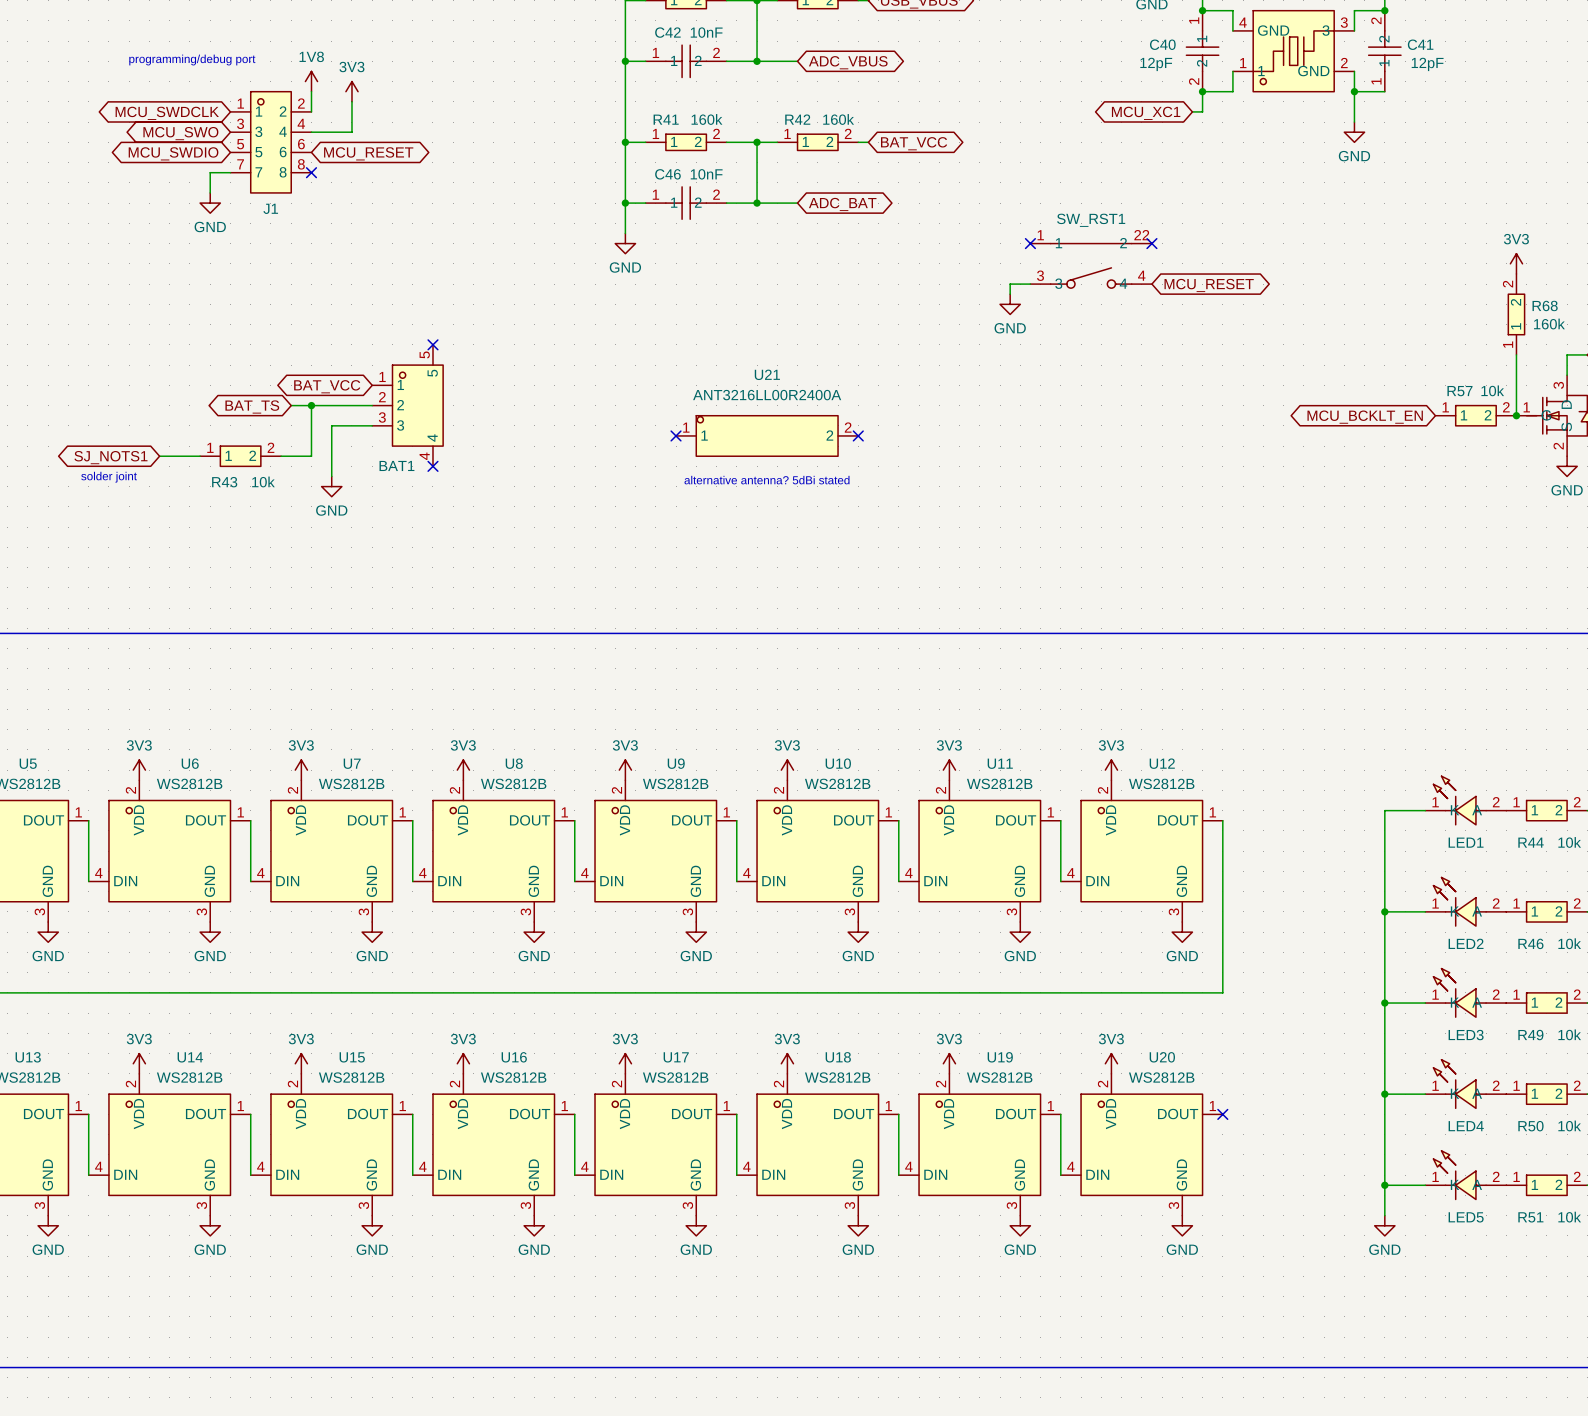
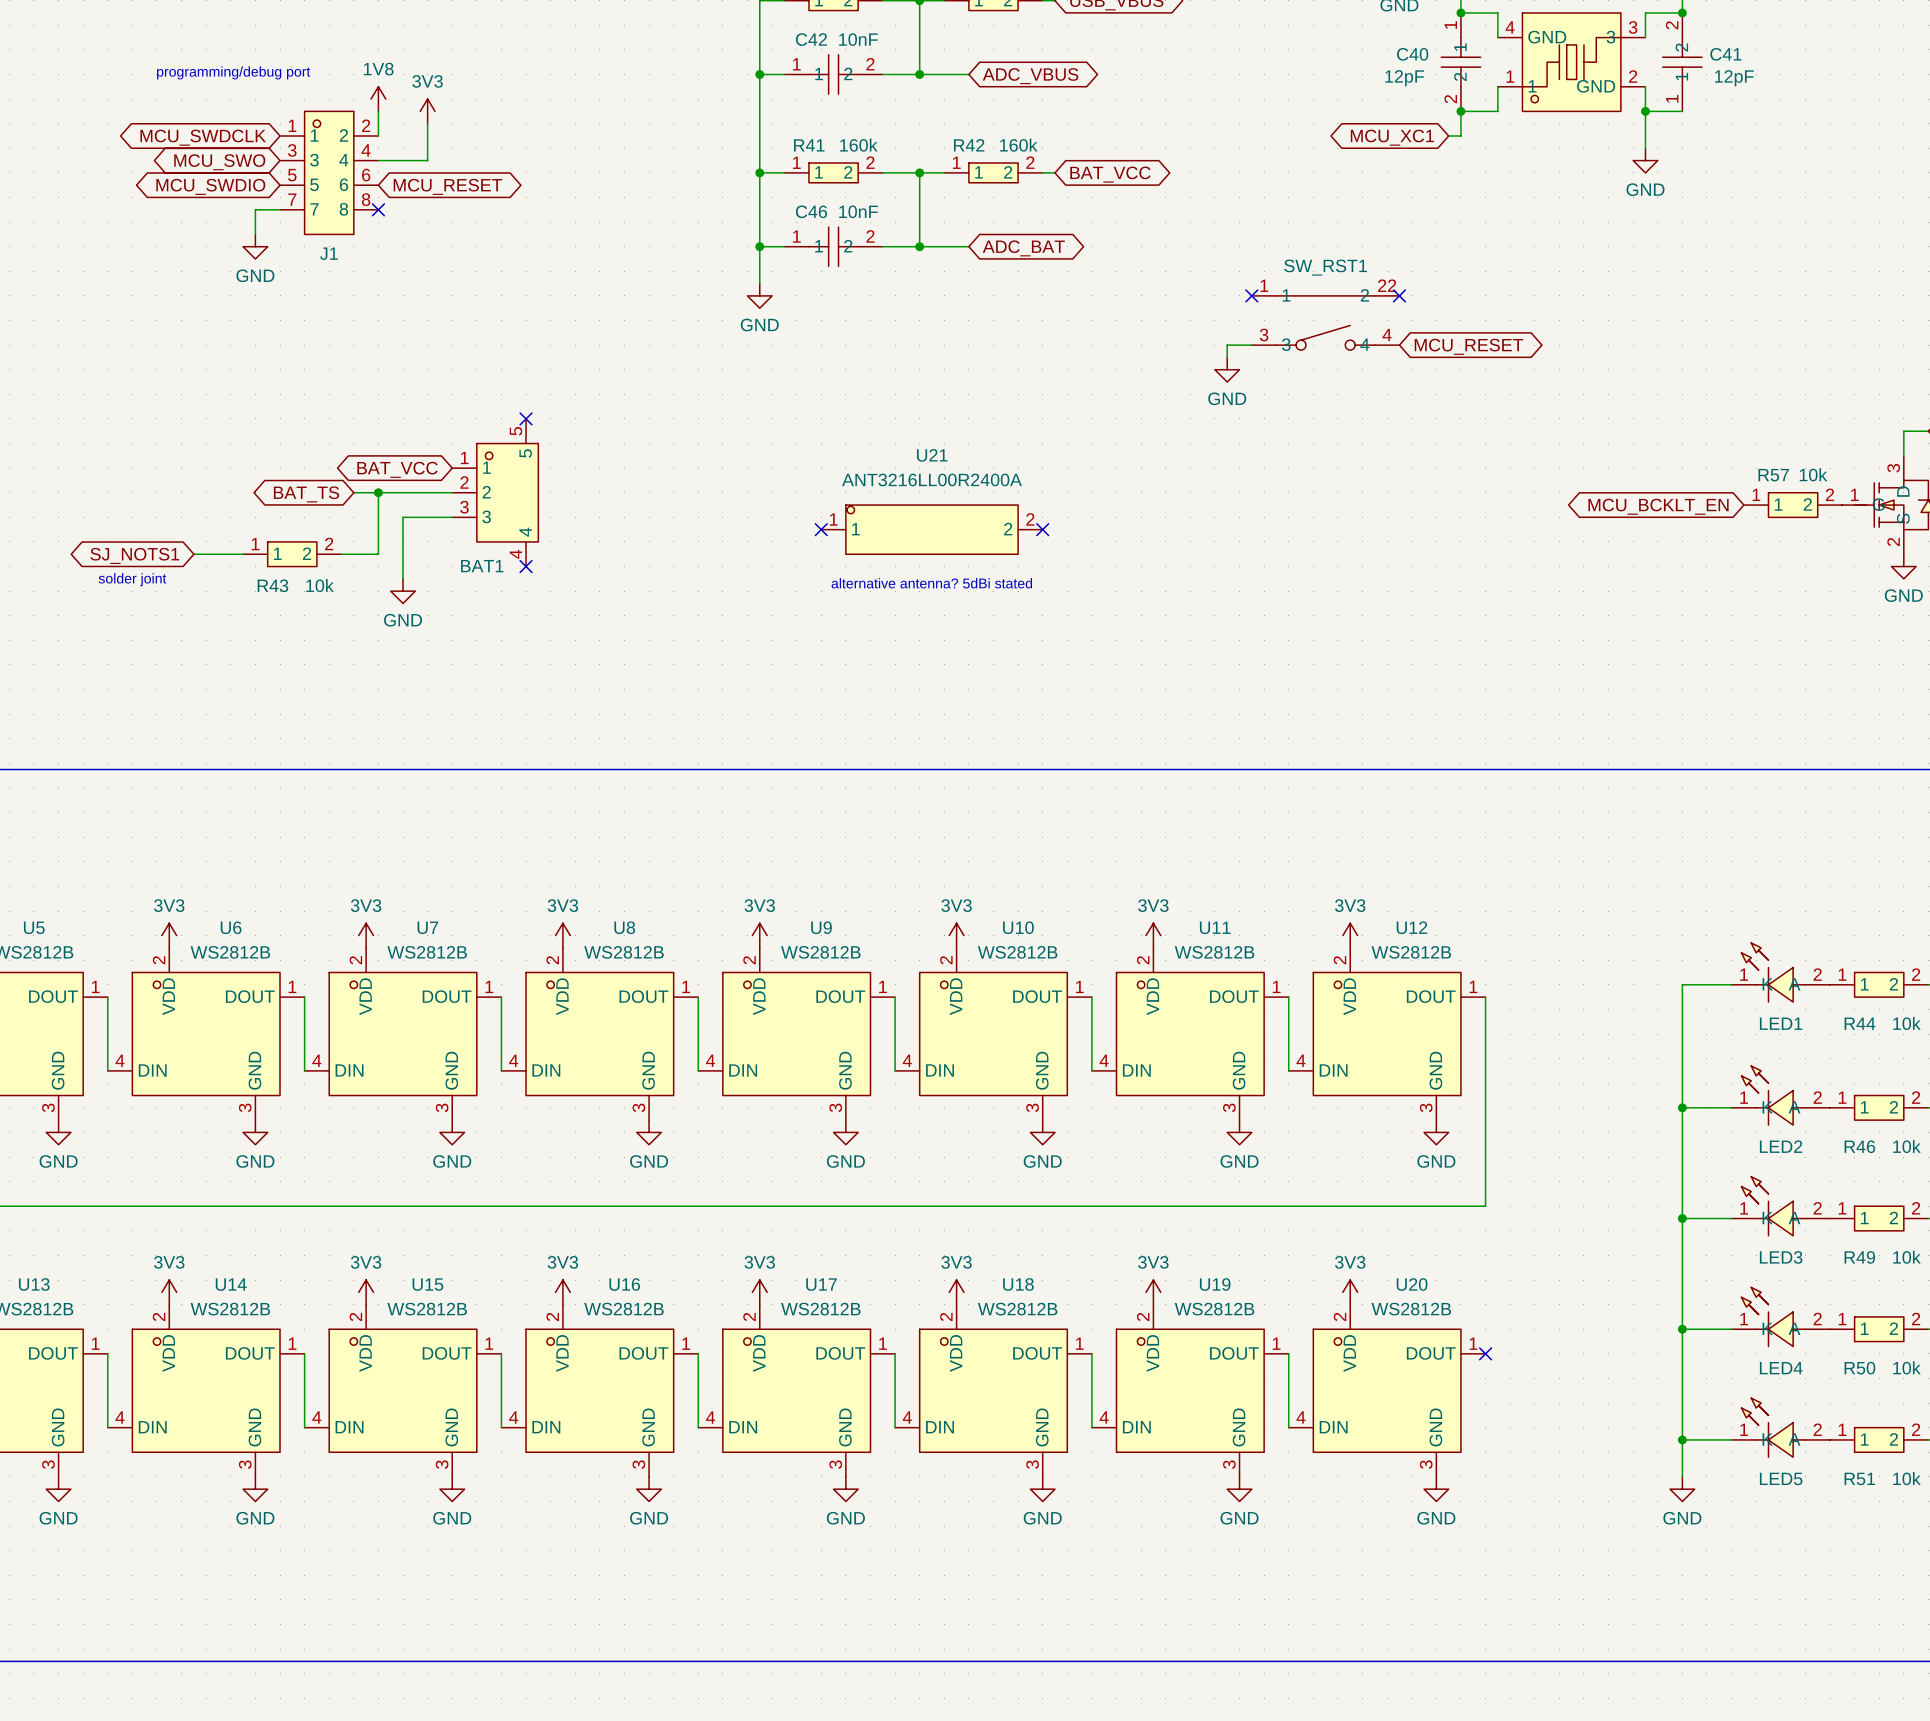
power symbol: 3V3 (1516, 263) -> none
R68: (1516, 314) -> none
wire: (1516, 354) (1516, 415) -> none
junction: (1516, 415) -> none

